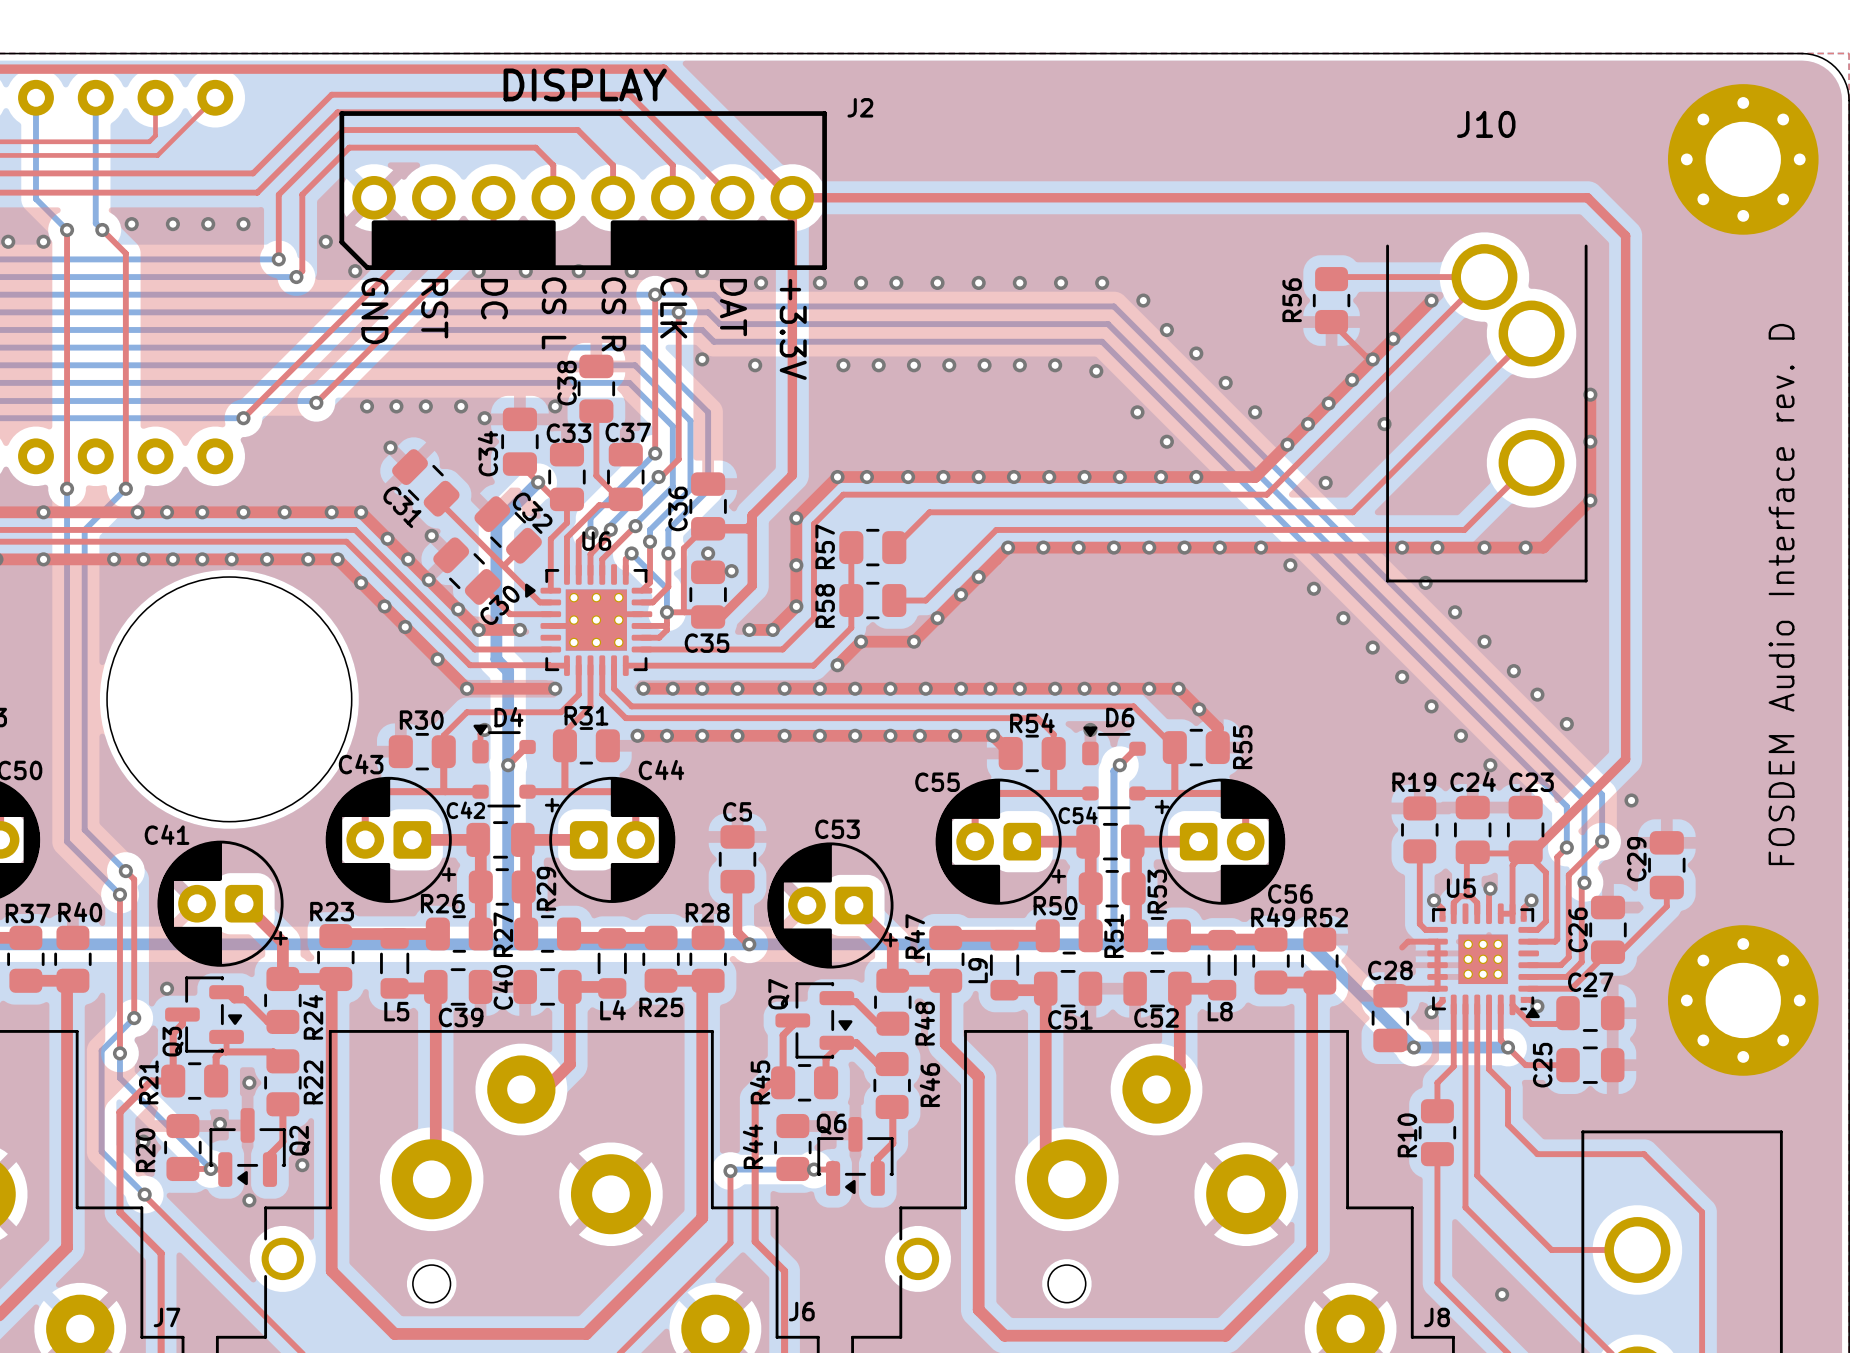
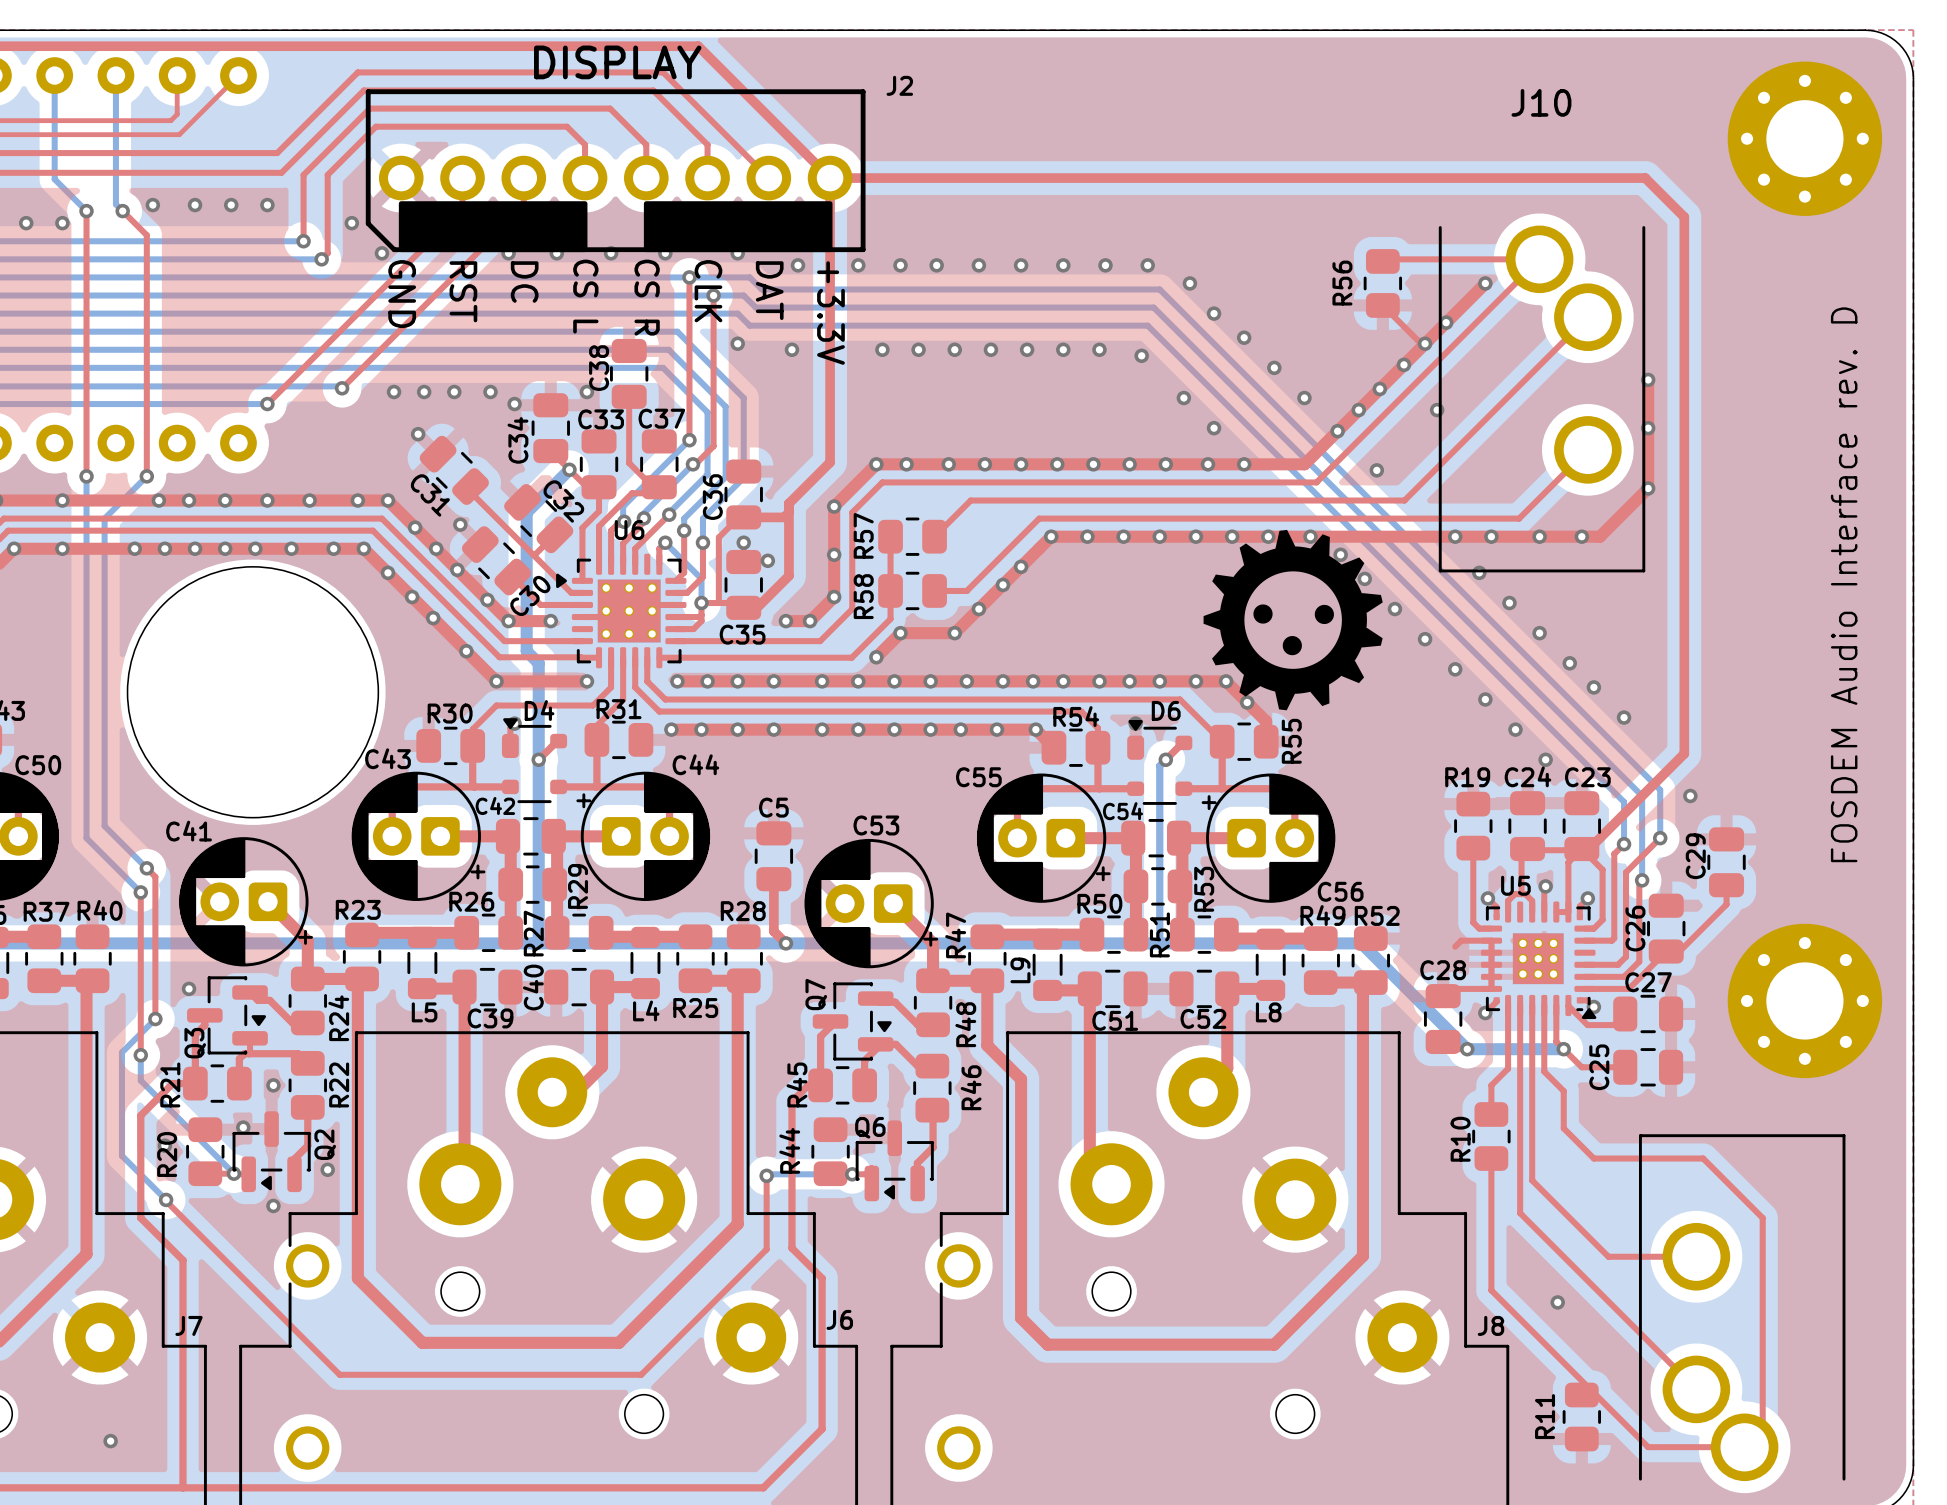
drawing: none -> [1203, 529, 1383, 711]

